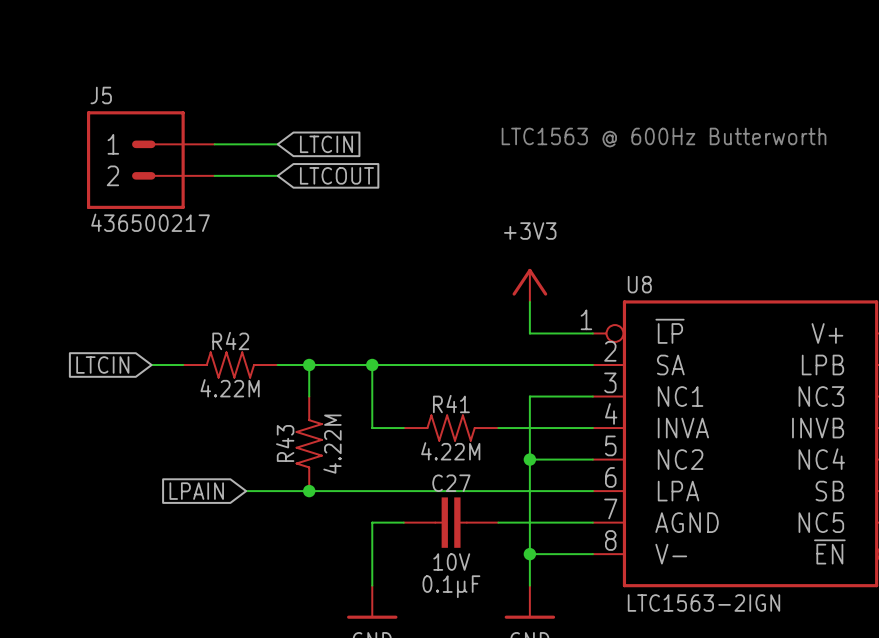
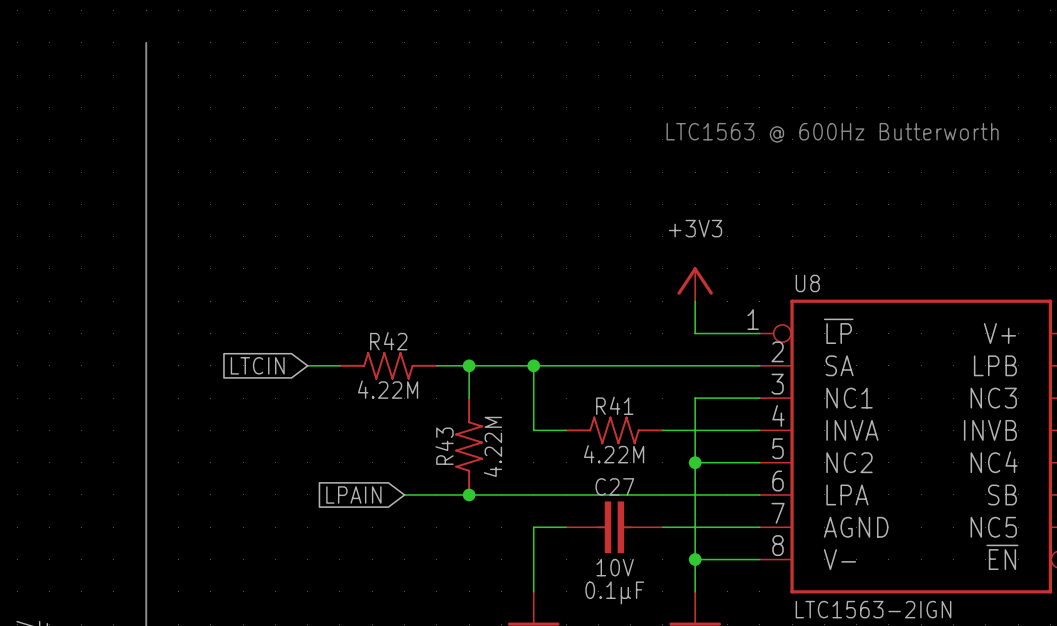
wire: (214, 144) (277, 144) -> none
global label: LTCIN (326, 144) -> none
J5: (150, 160) -> none
wire: (214, 175) (277, 175) -> none
global label: LTCOUT (336, 175) -> none

